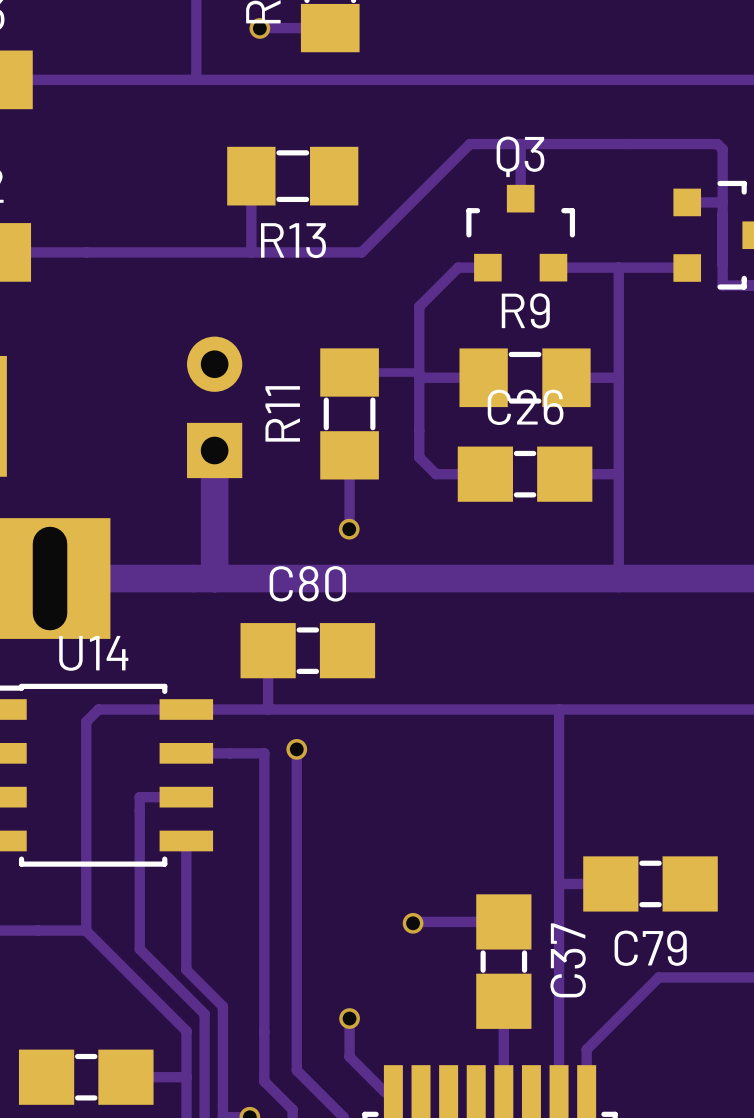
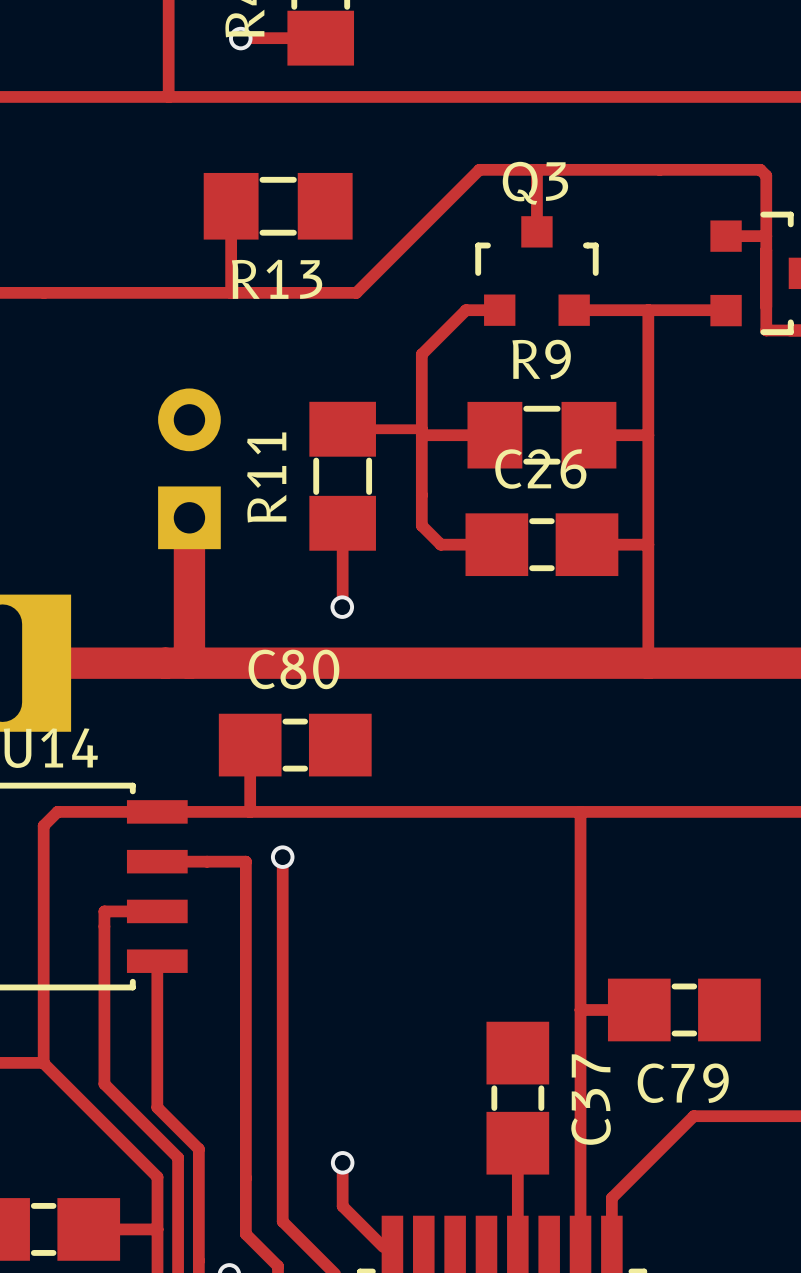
track: (503, 921) (413, 923) -> none
via: (413, 923) -> none

